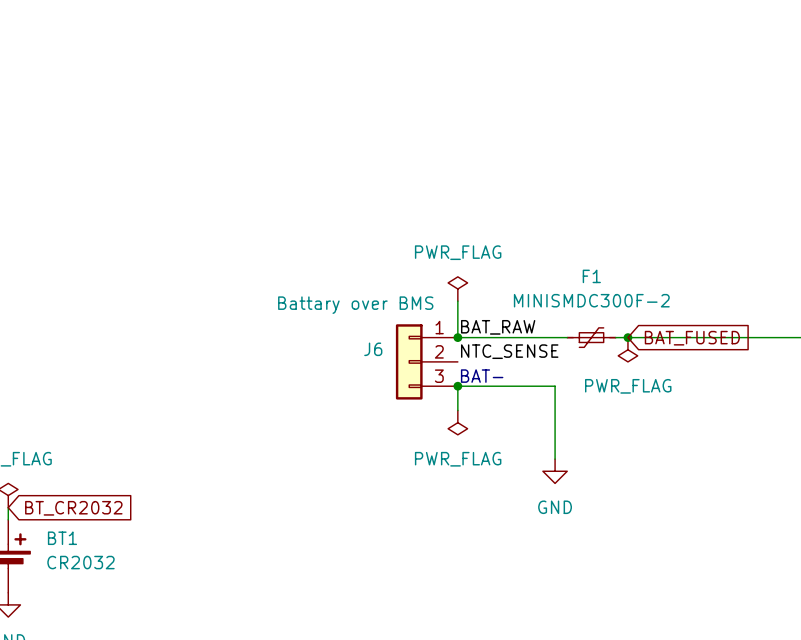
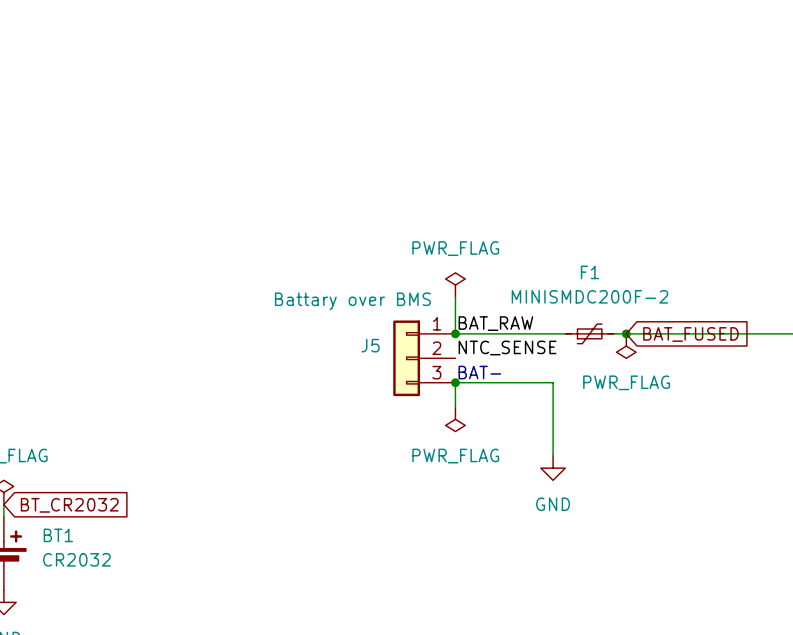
F1 value: MINISMDC300F-2 (591, 300) -> MINISMDC200F-2 (589, 296)
J6 name: J6 (373, 349) -> J5 (370, 345)

